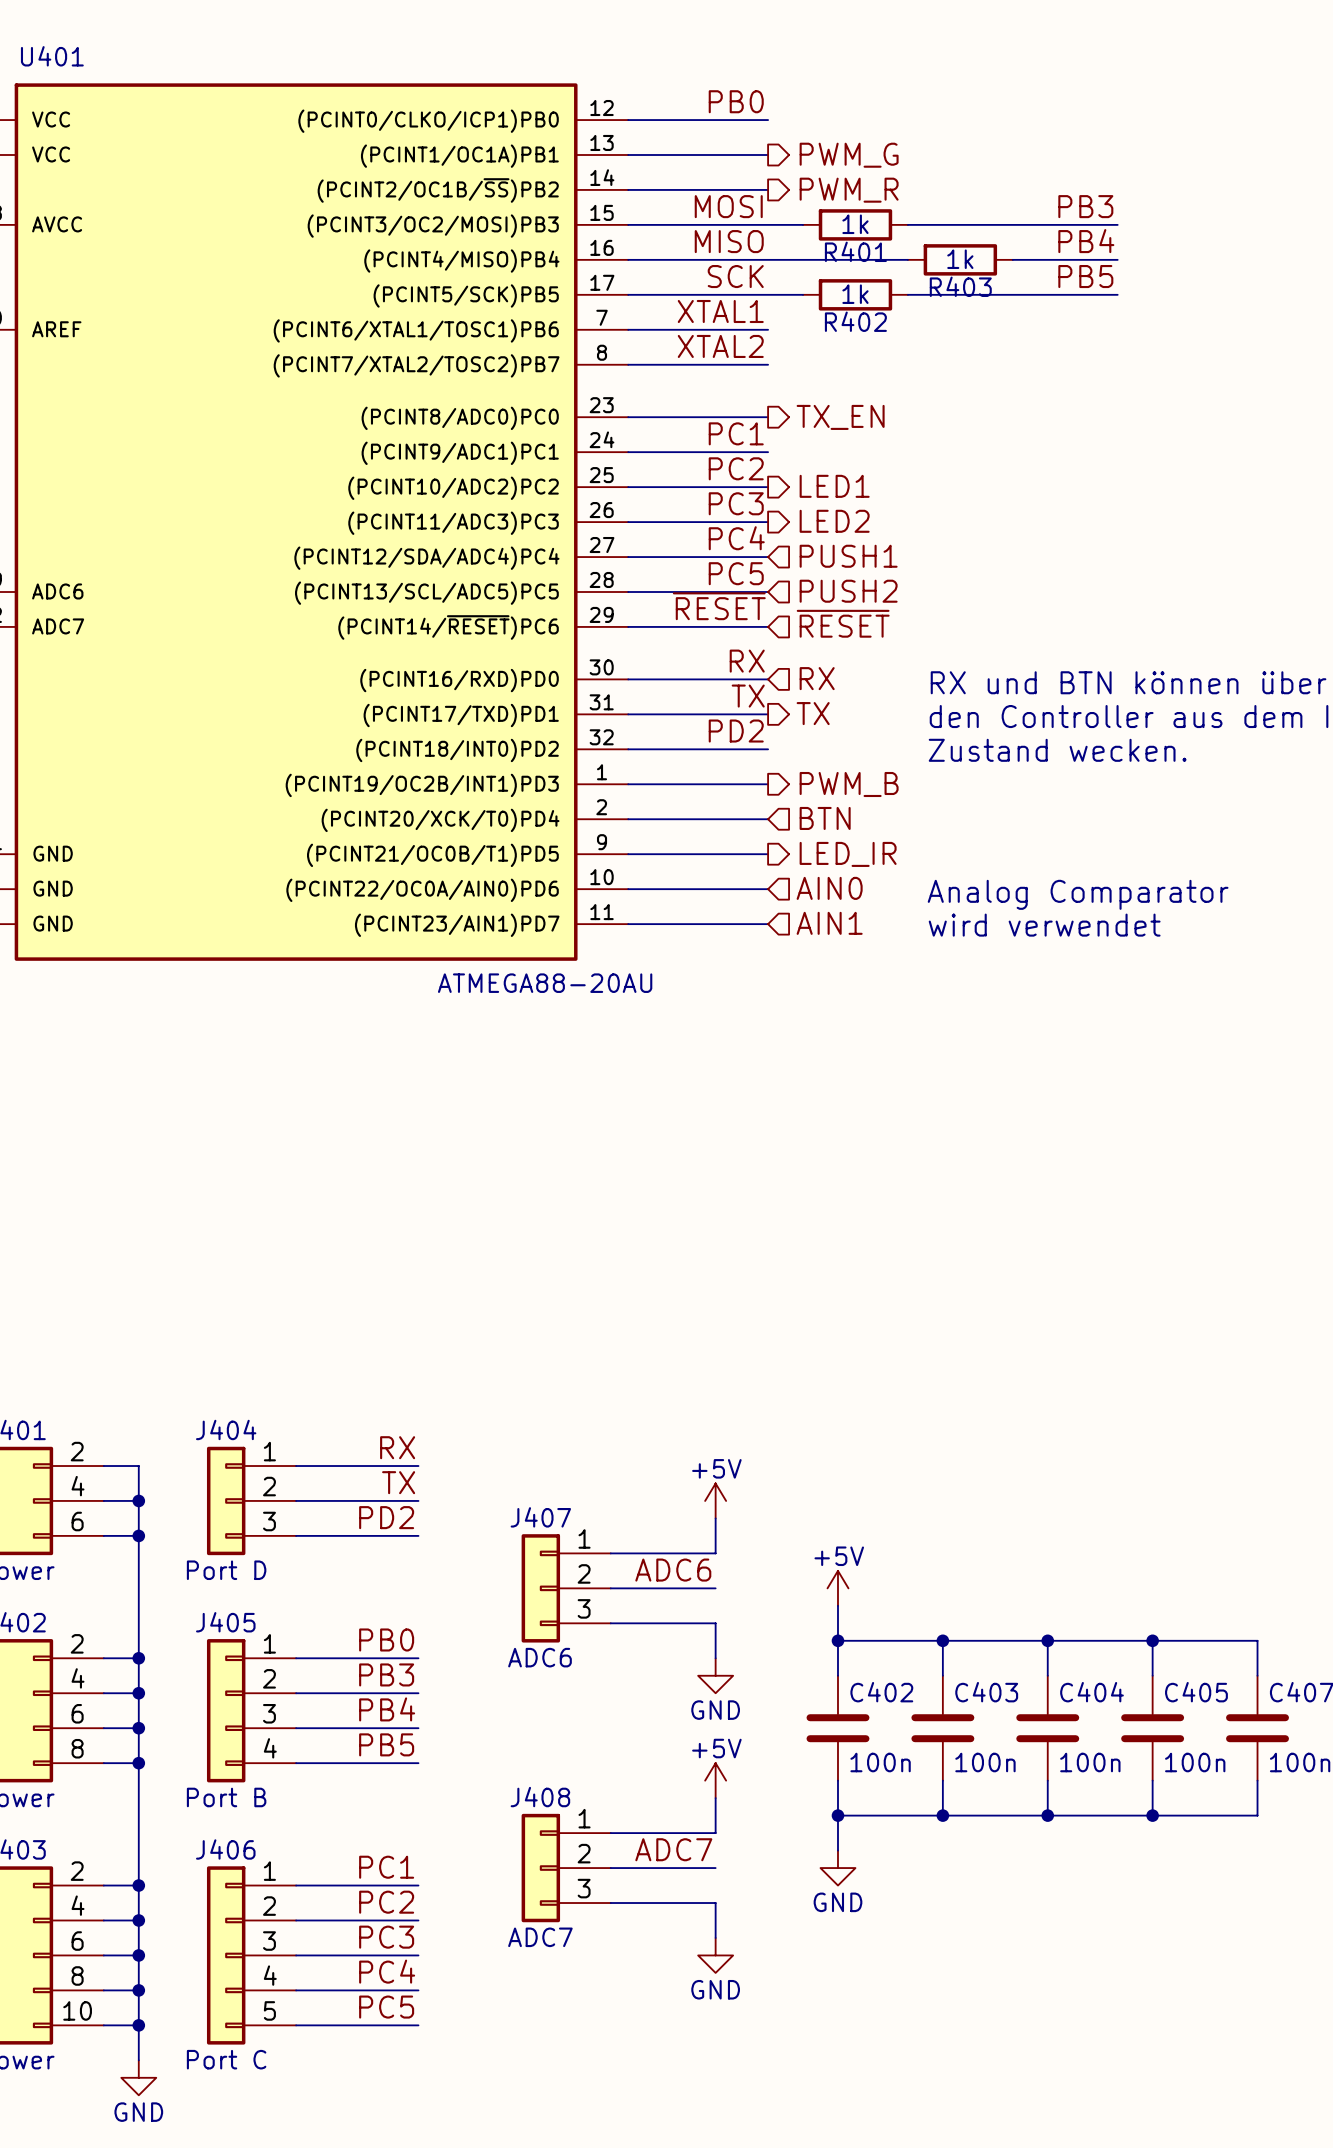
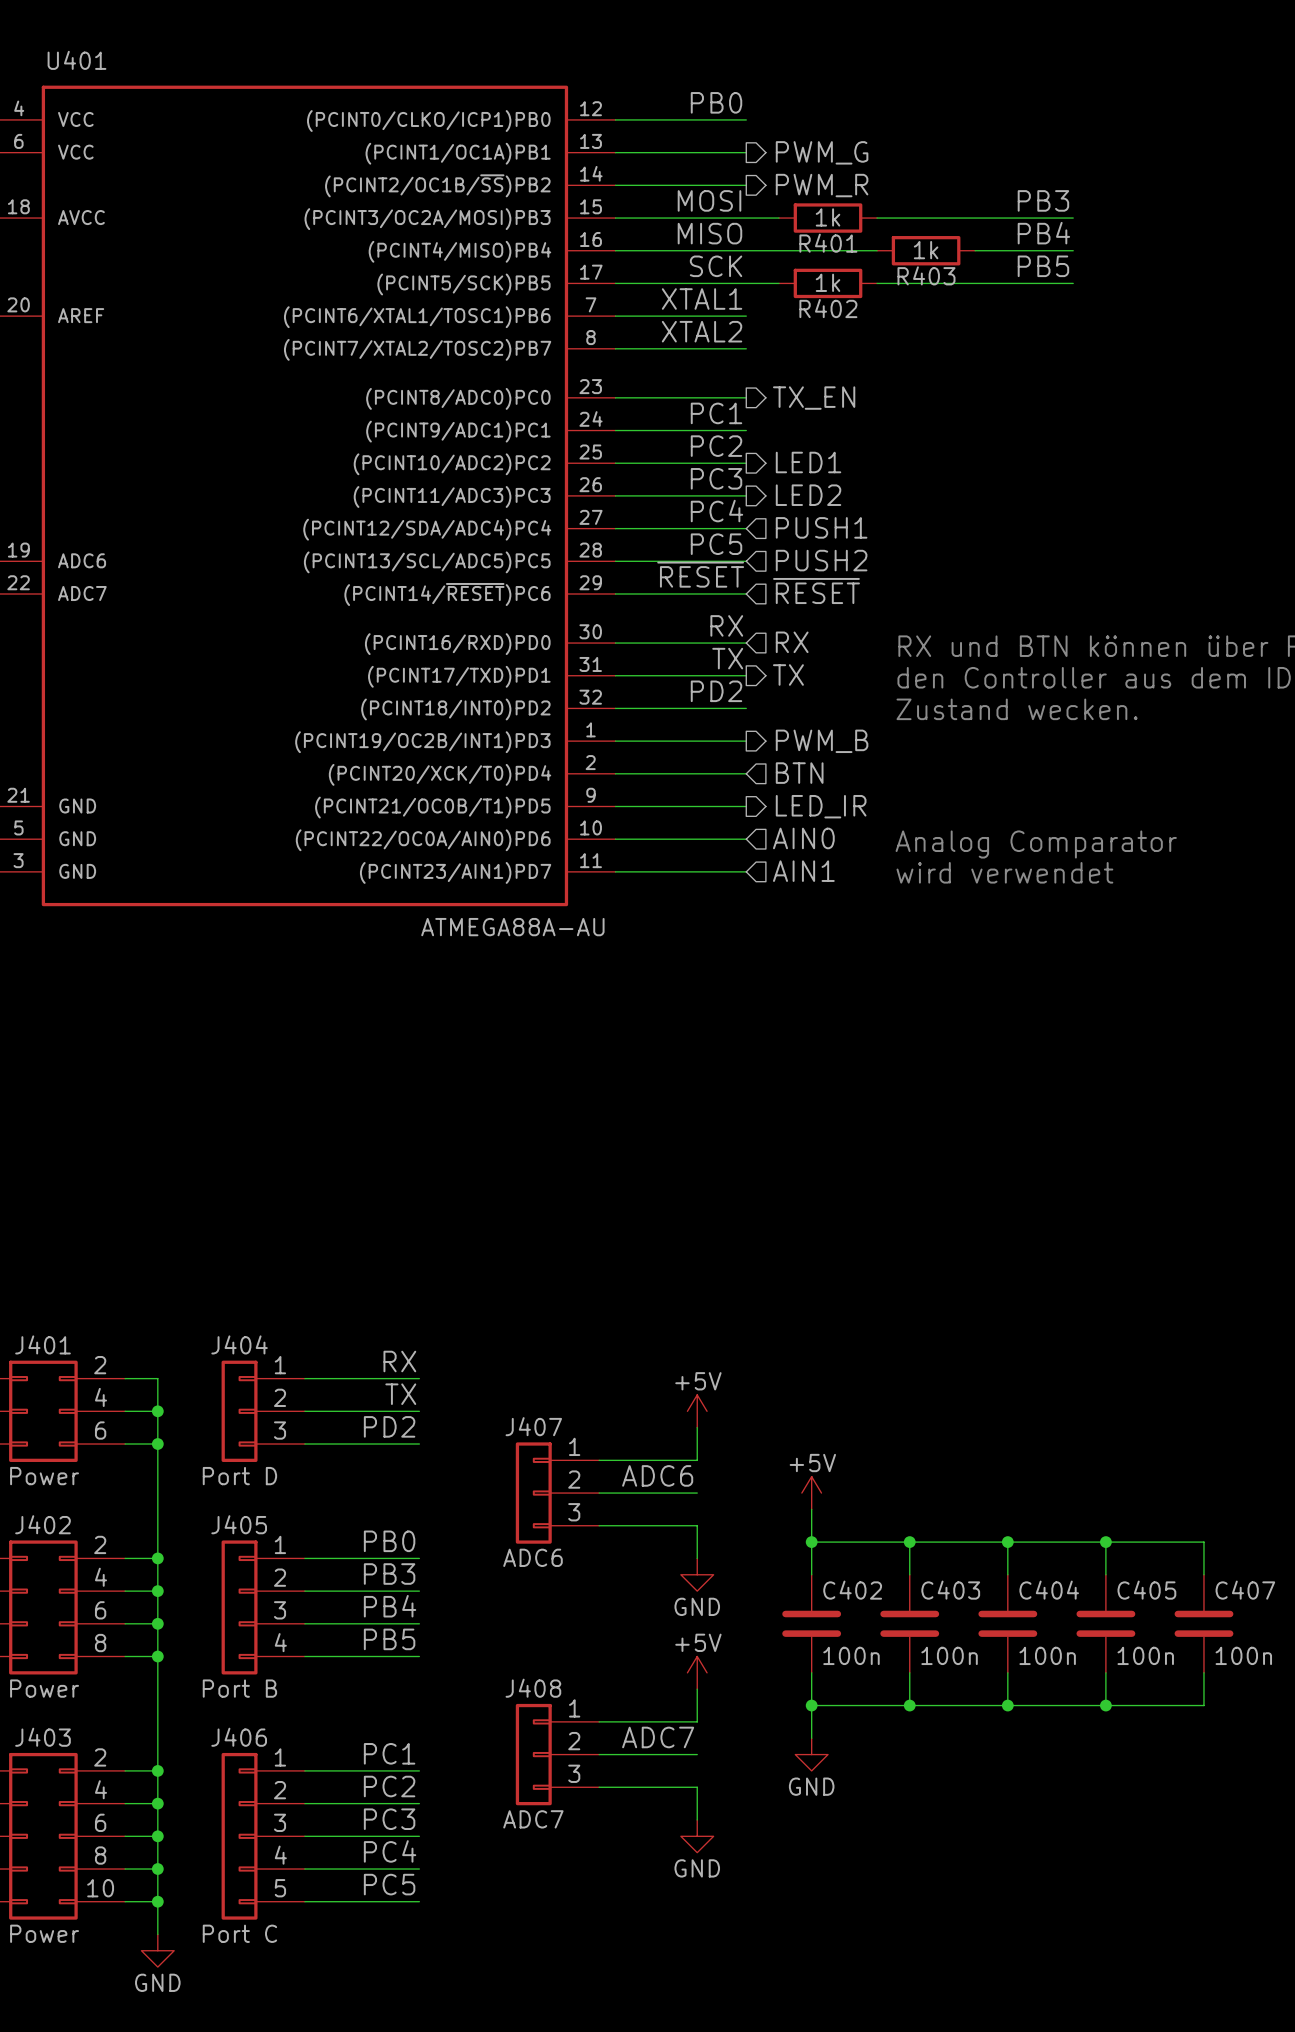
U401 pin name: (PCINT3/OC2/MOSI)PB3 (433, 226) -> (PCINT3/OC2A/MOSI)PB3 (427, 219)
U401 value: ATMEGA88-20AU (545, 983) -> ATMEGA88A-AU (512, 927)

